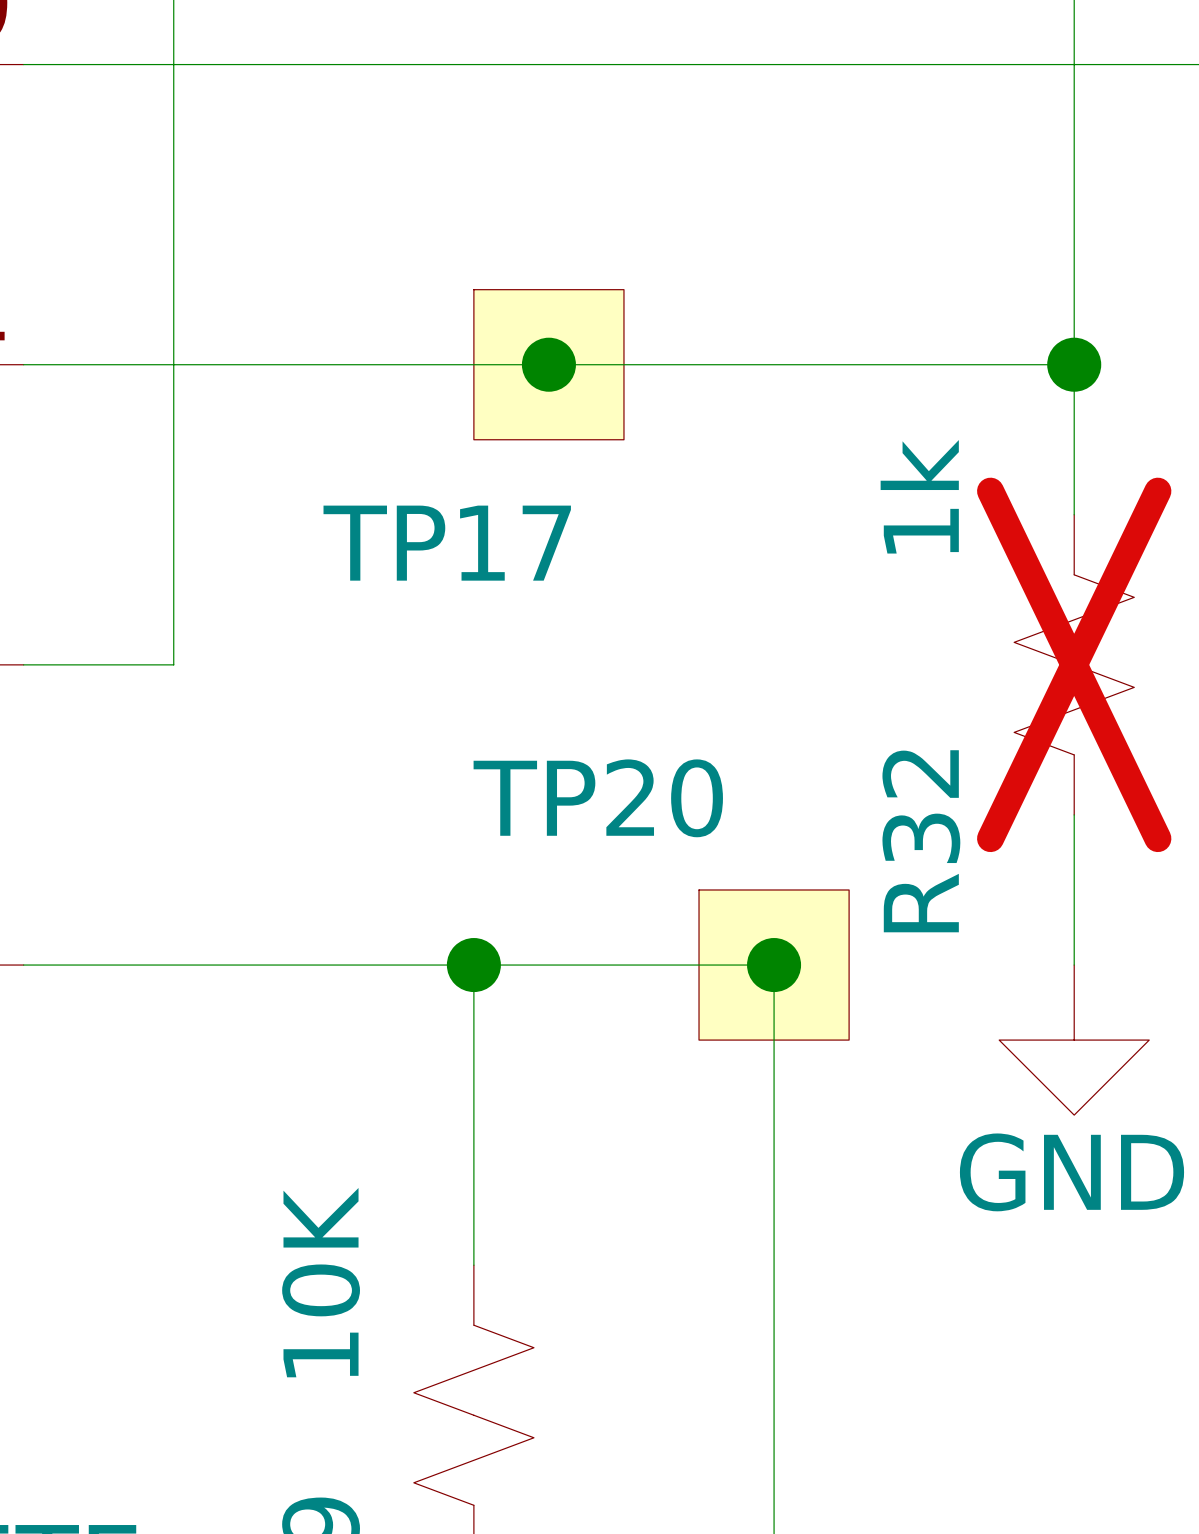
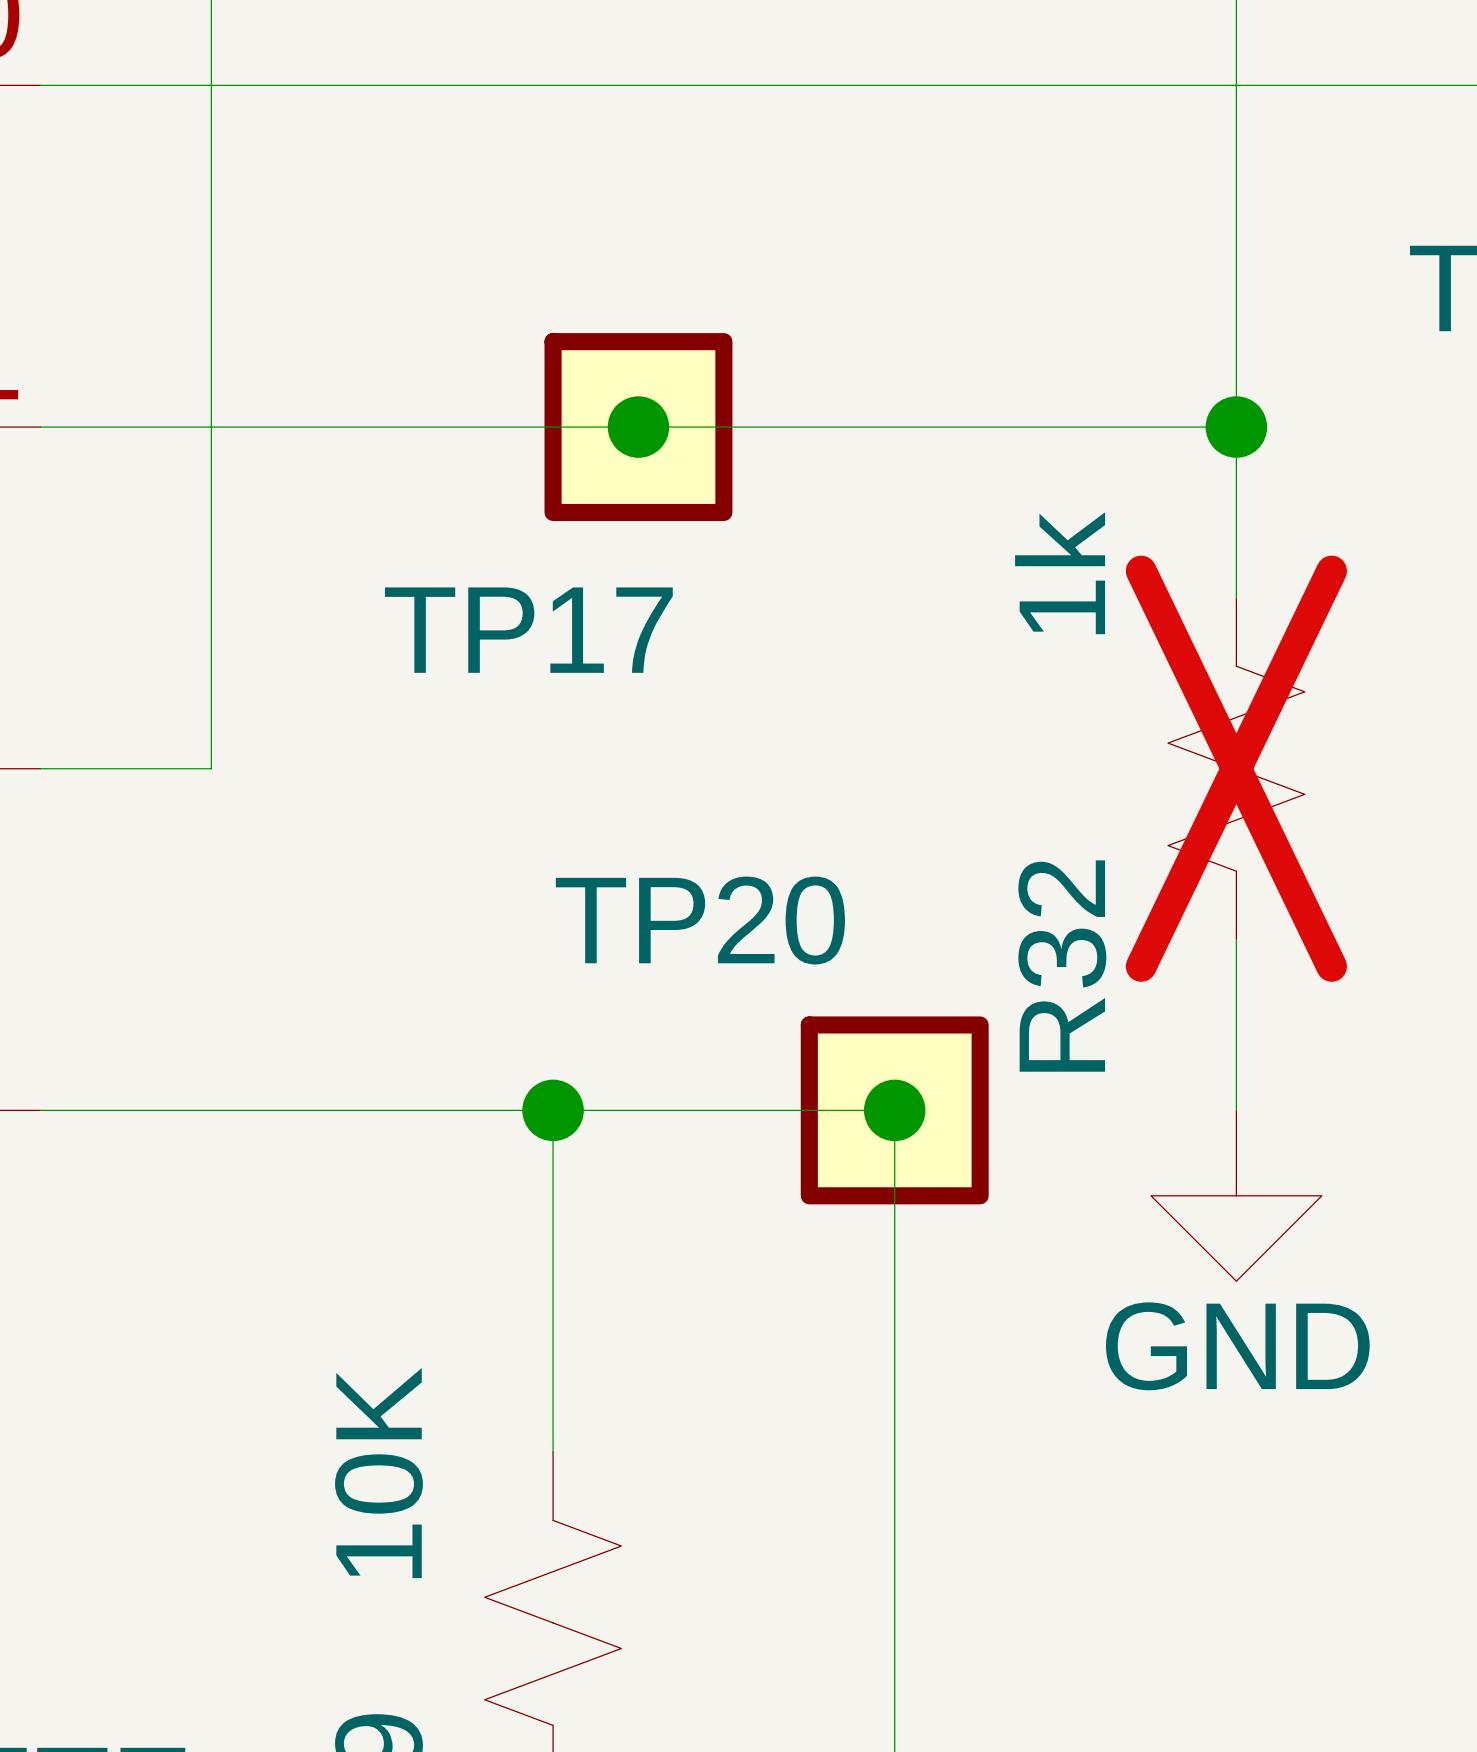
TP17 symbol: [473, 289, 624, 440] -> [544, 333, 733, 522]
TP20 symbol: [699, 889, 850, 1041] -> [800, 1016, 989, 1205]

